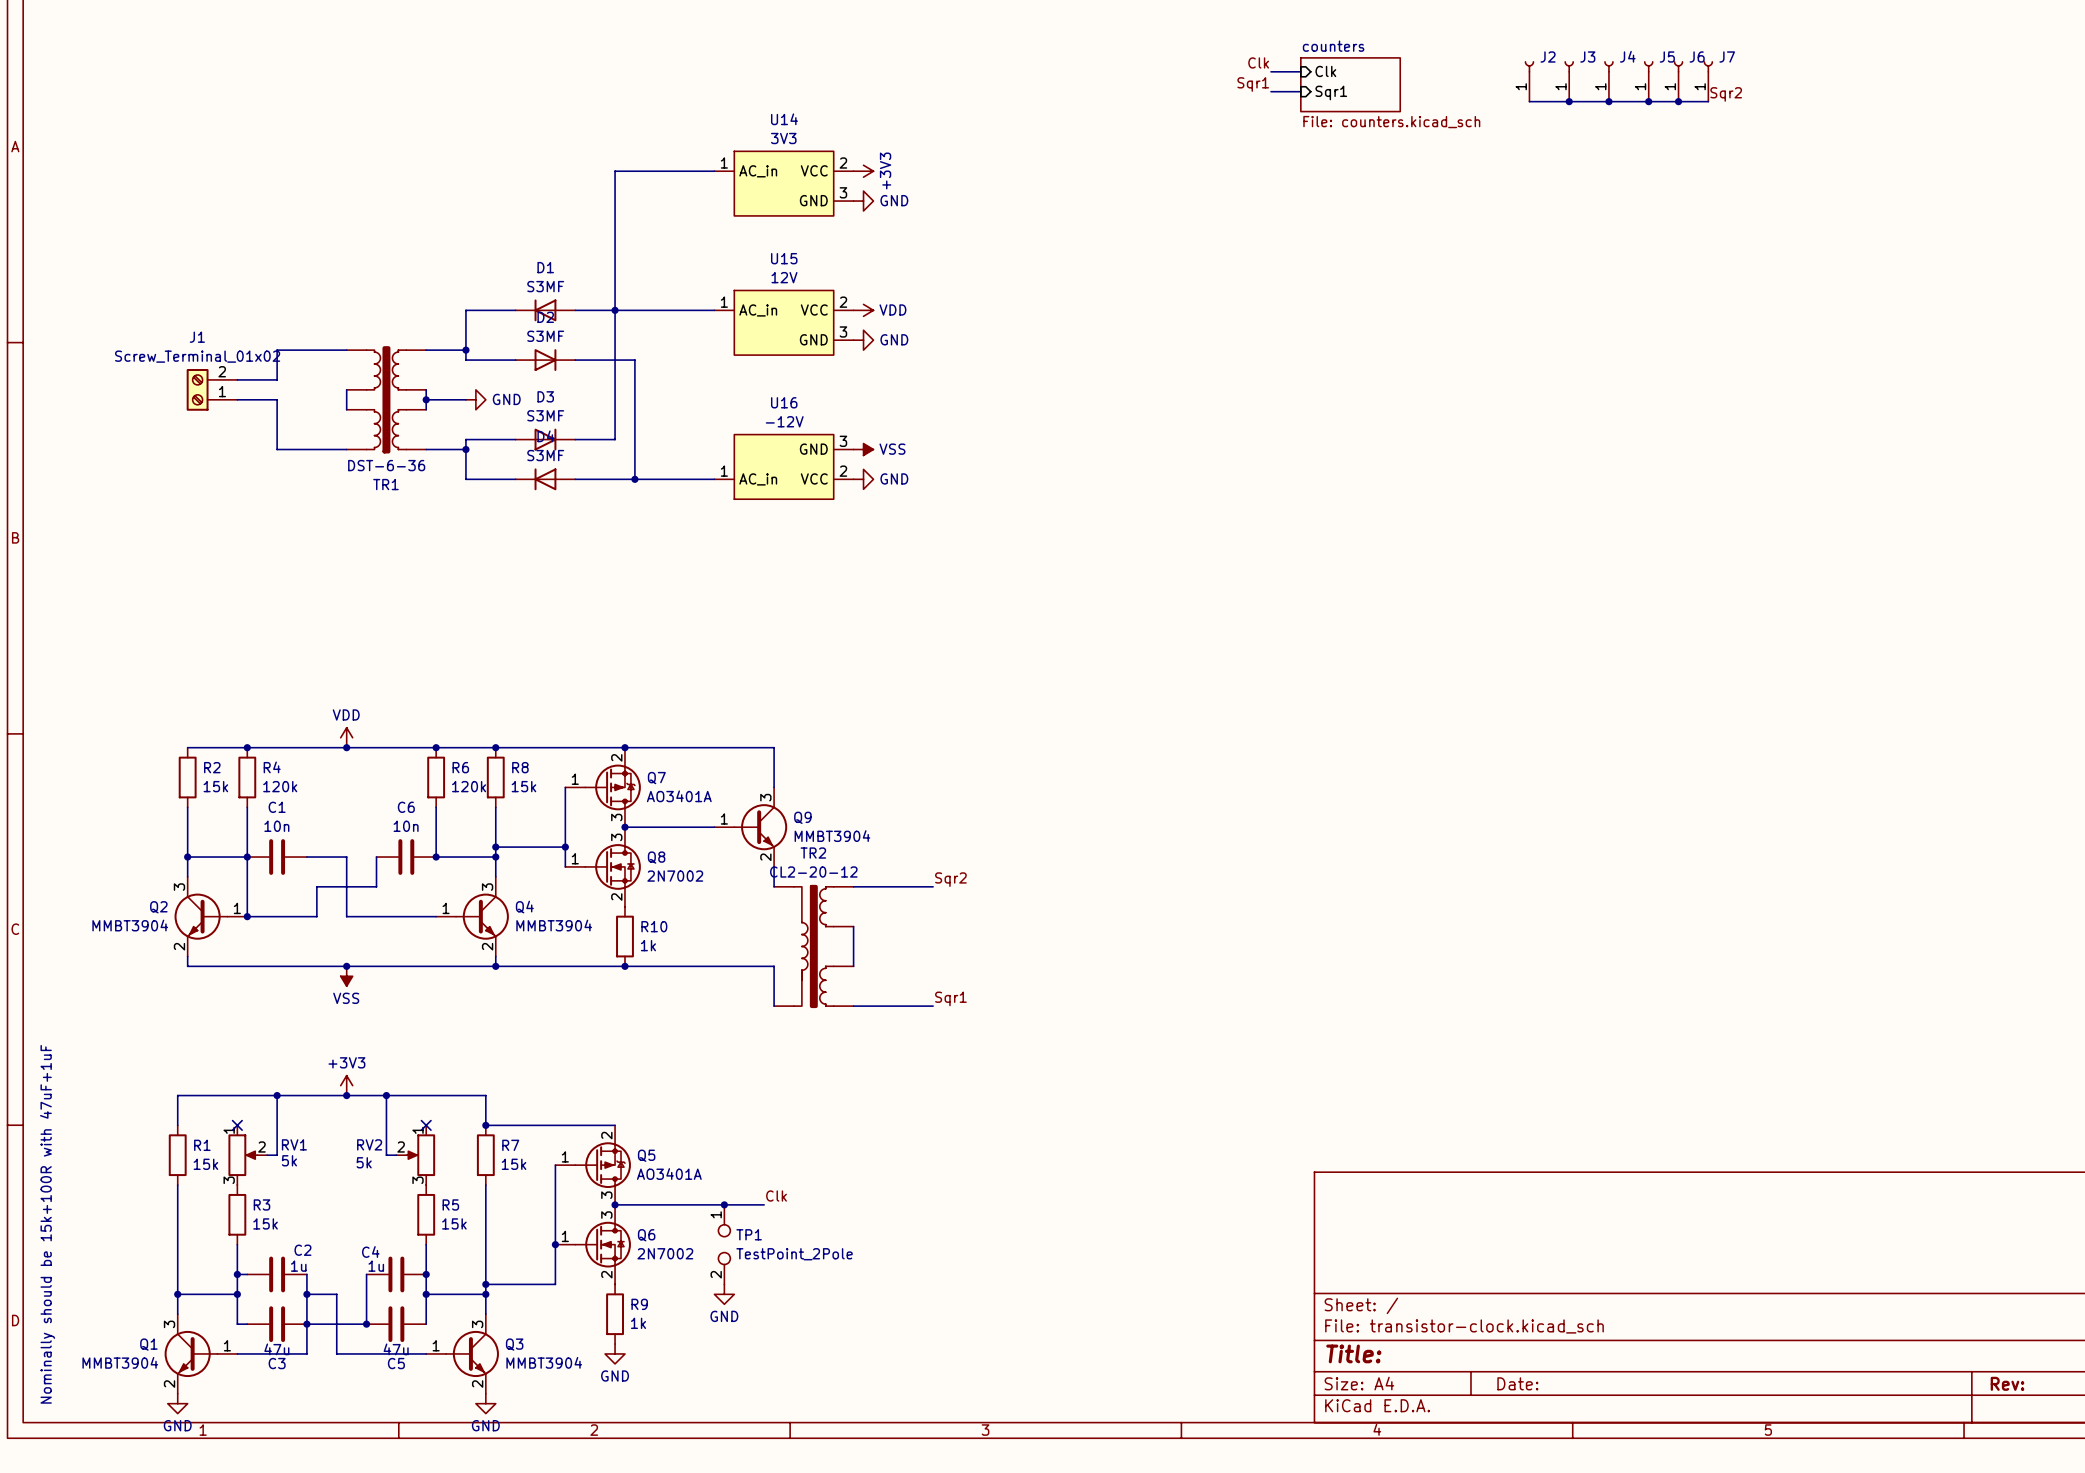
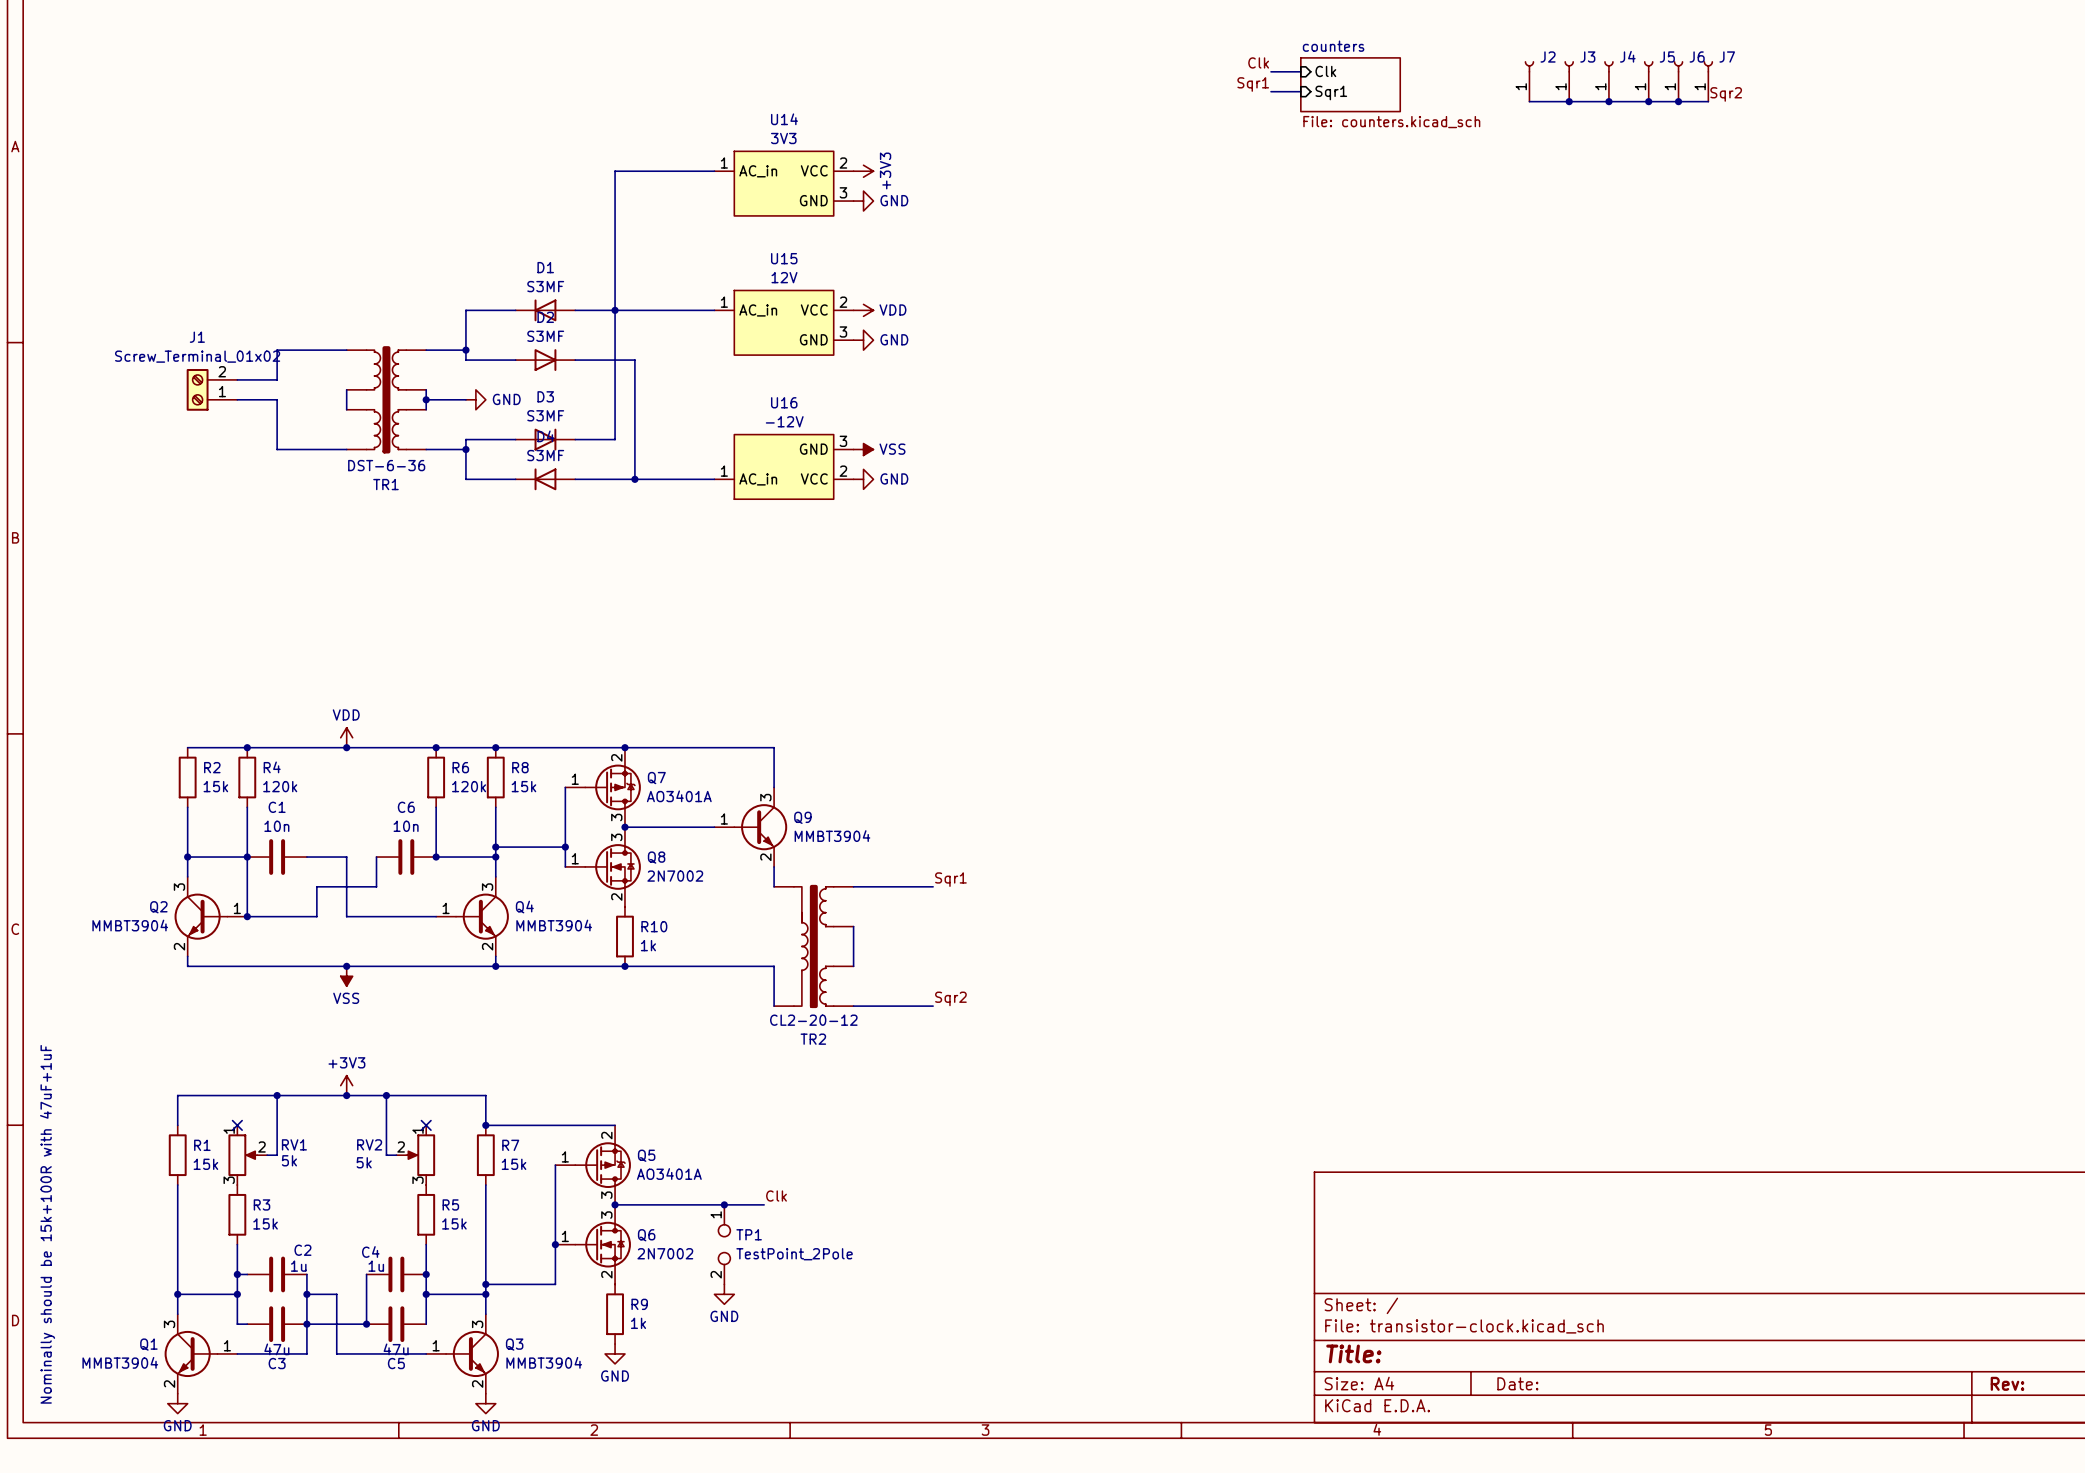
label: Sqr2 (950, 879) -> Sqr1 (950, 879)
TR2 flip: as is (813, 946) -> up-down (813, 946)
label: Sqr1 (950, 998) -> Sqr2 (950, 998)

